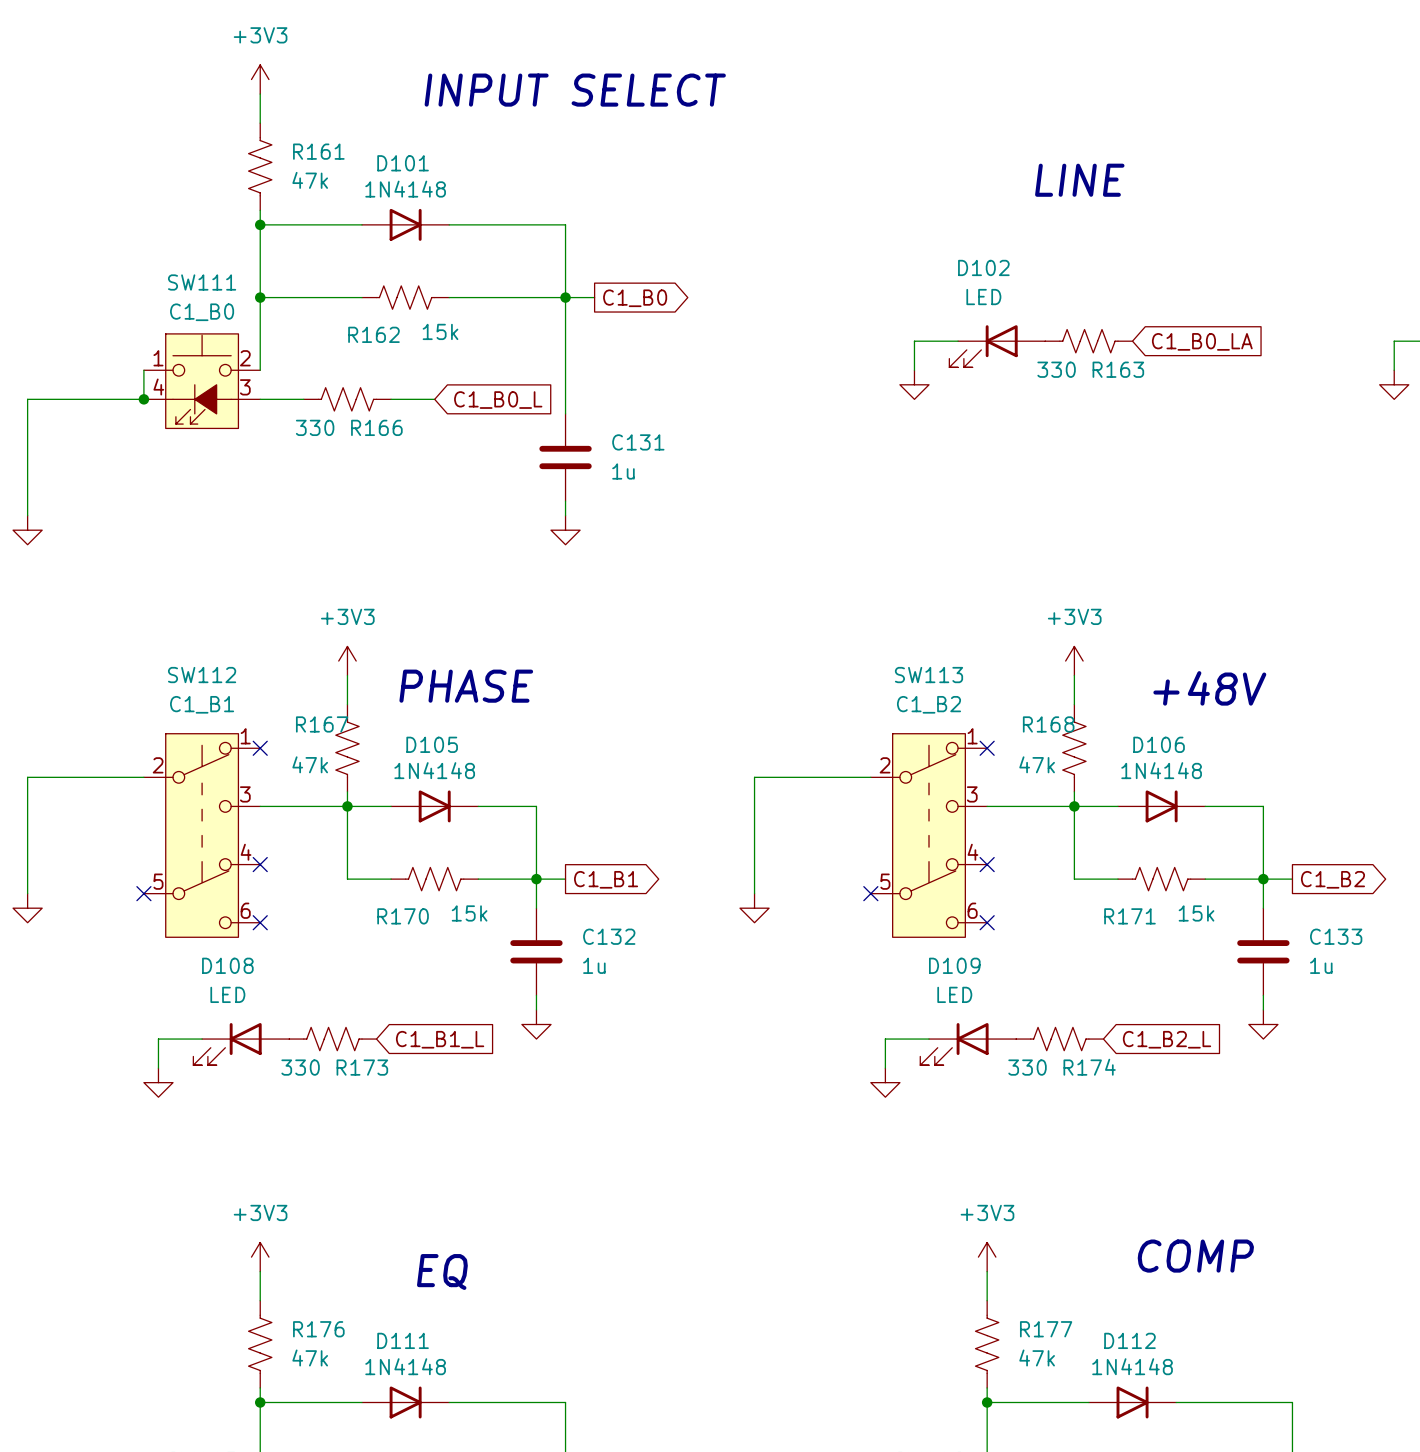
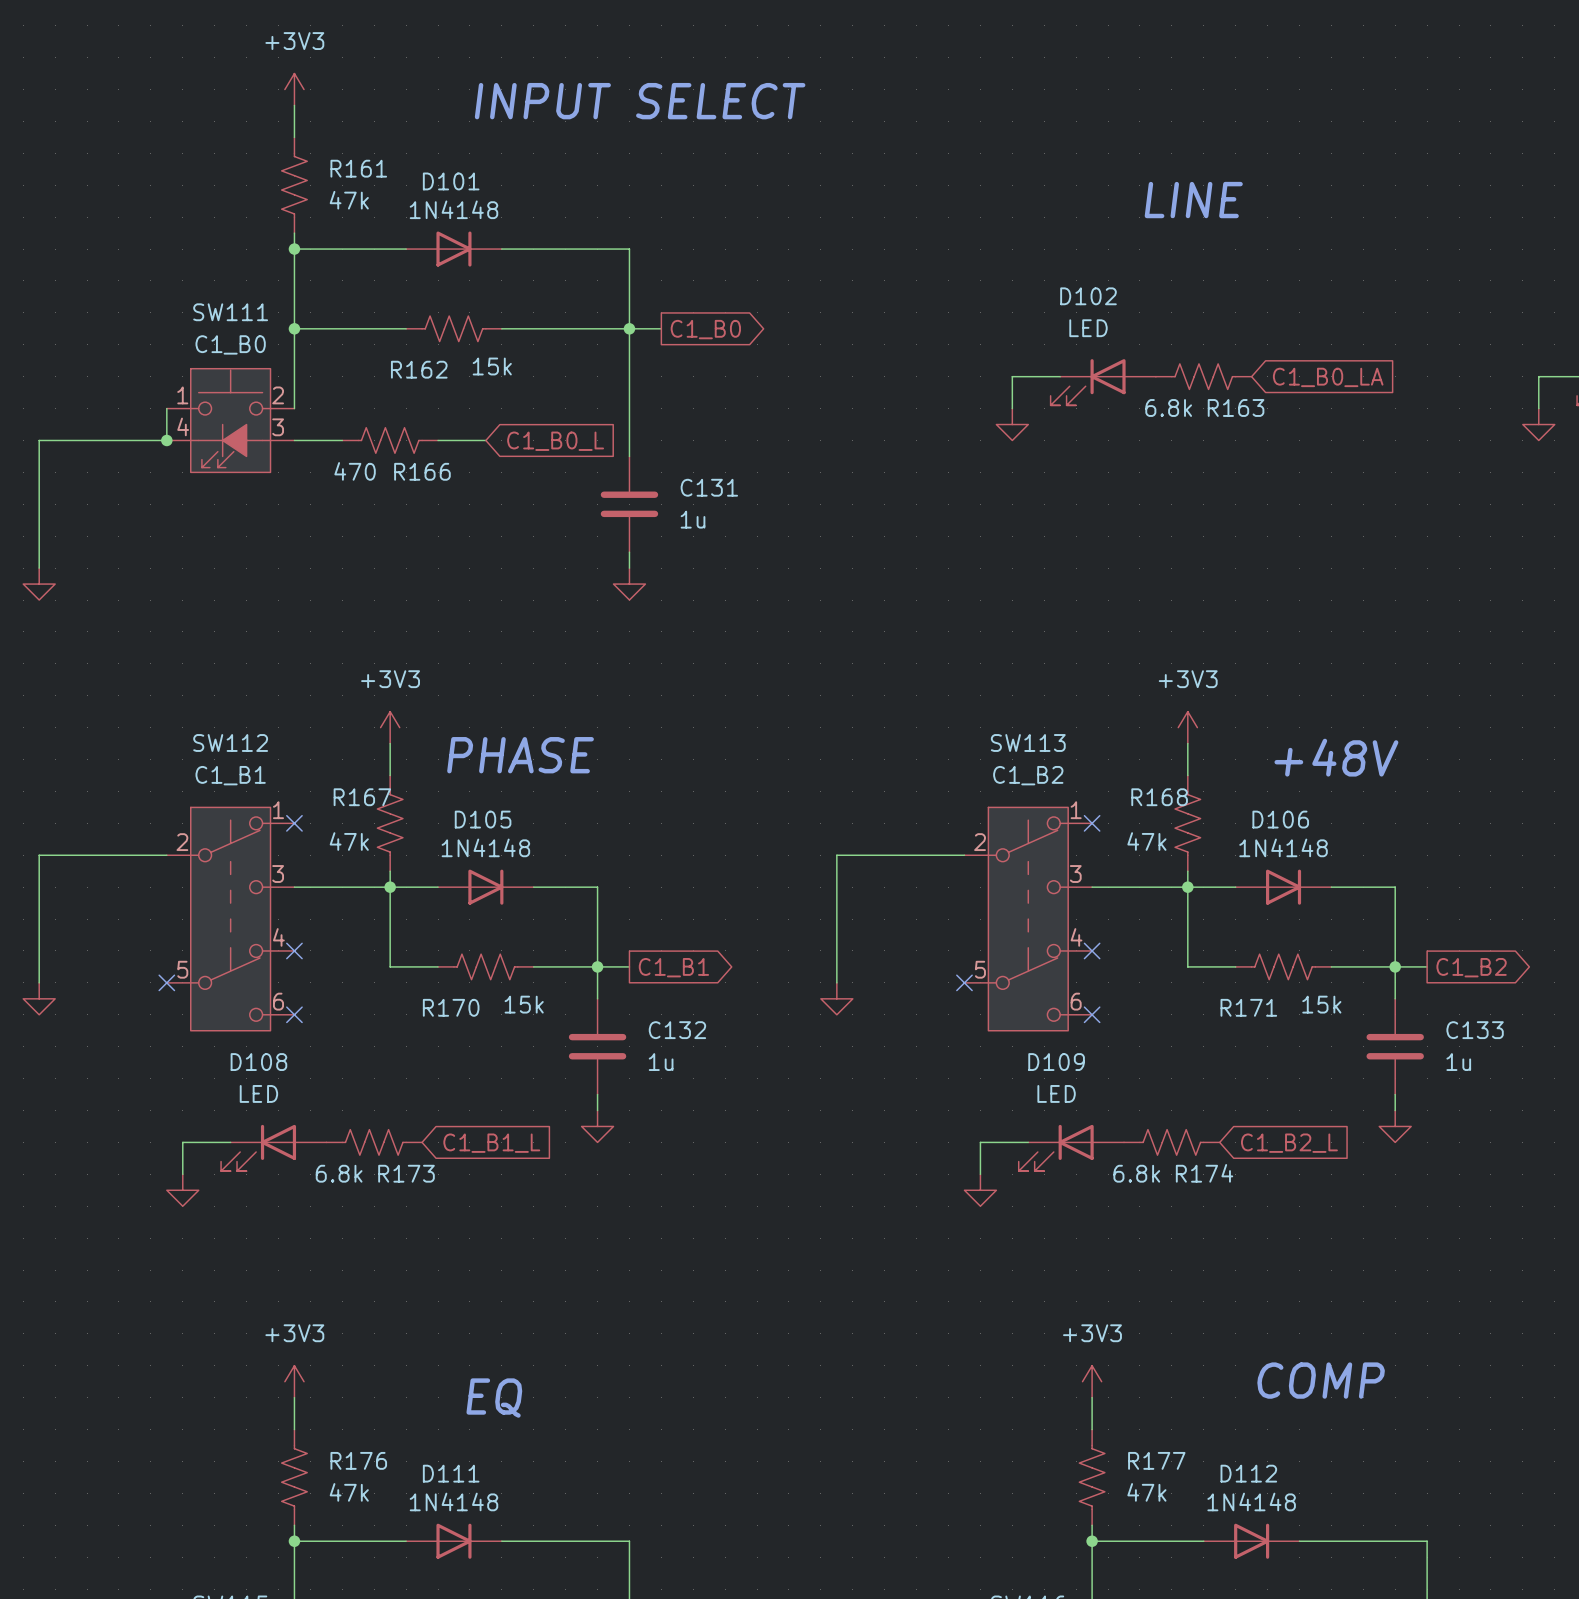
R163 value: 330 (1056, 369) -> 6.8k (1168, 407)
R166 value: 330 (315, 427) -> 470 (355, 471)
R173 value: 330 (300, 1067) -> 6.8k (339, 1173)
R174 value: 330 (1027, 1067) -> 6.8k (1136, 1173)

